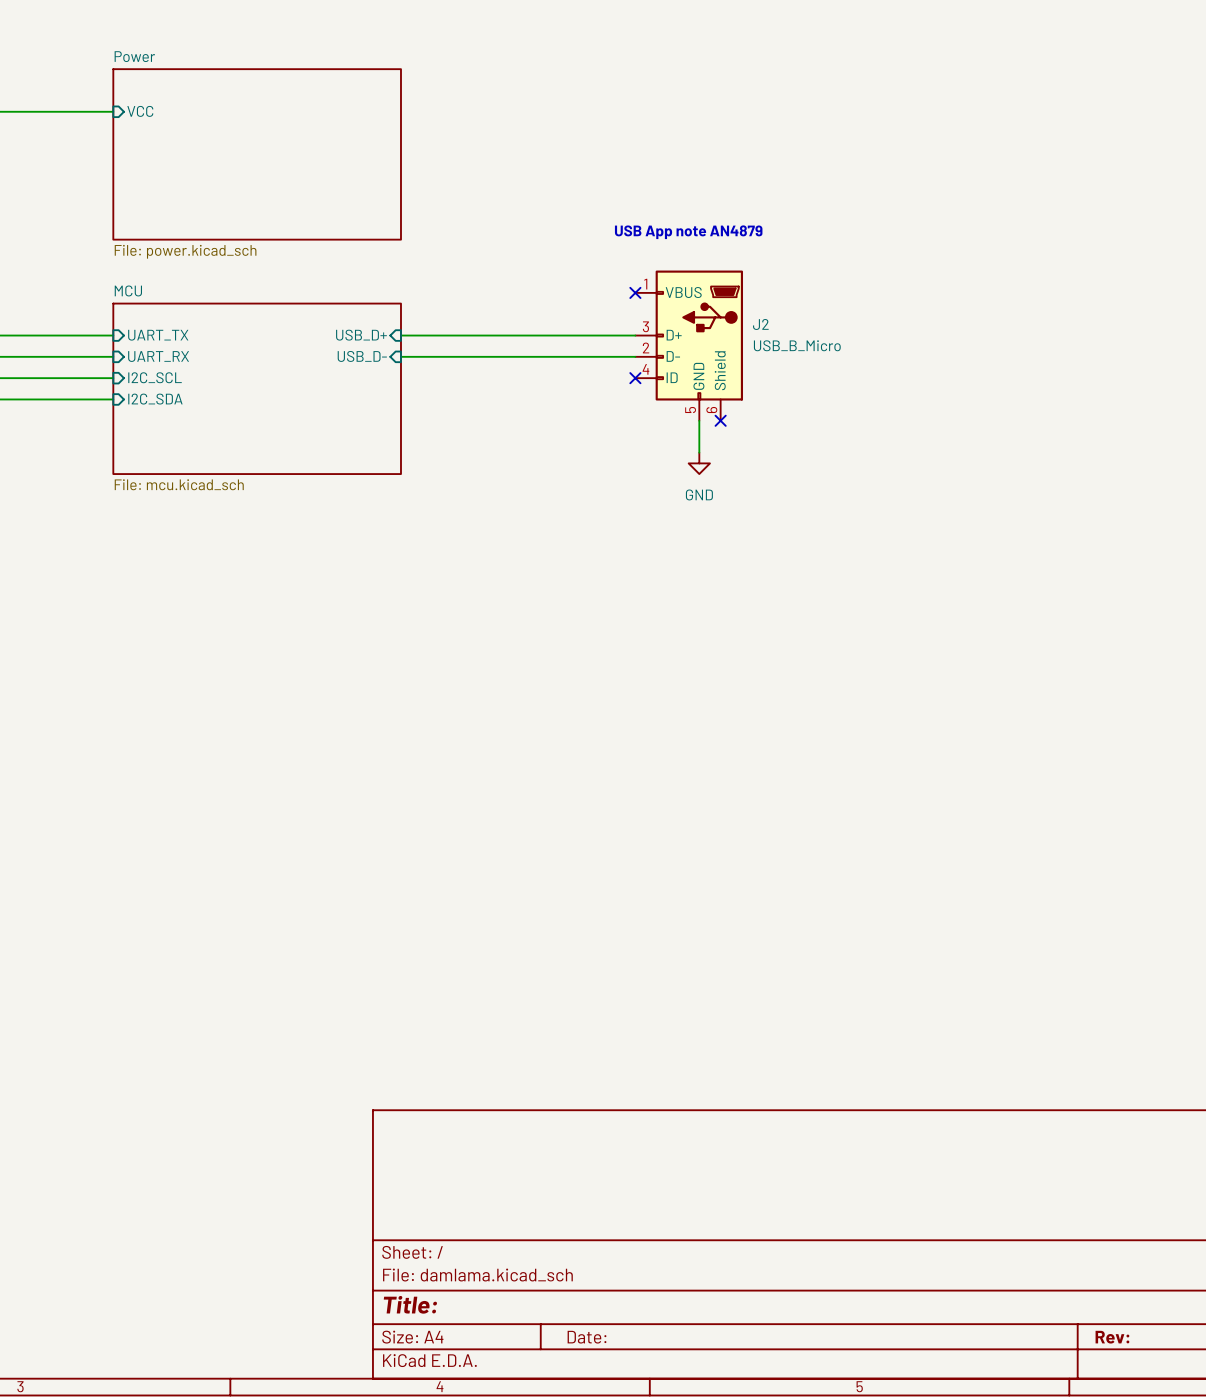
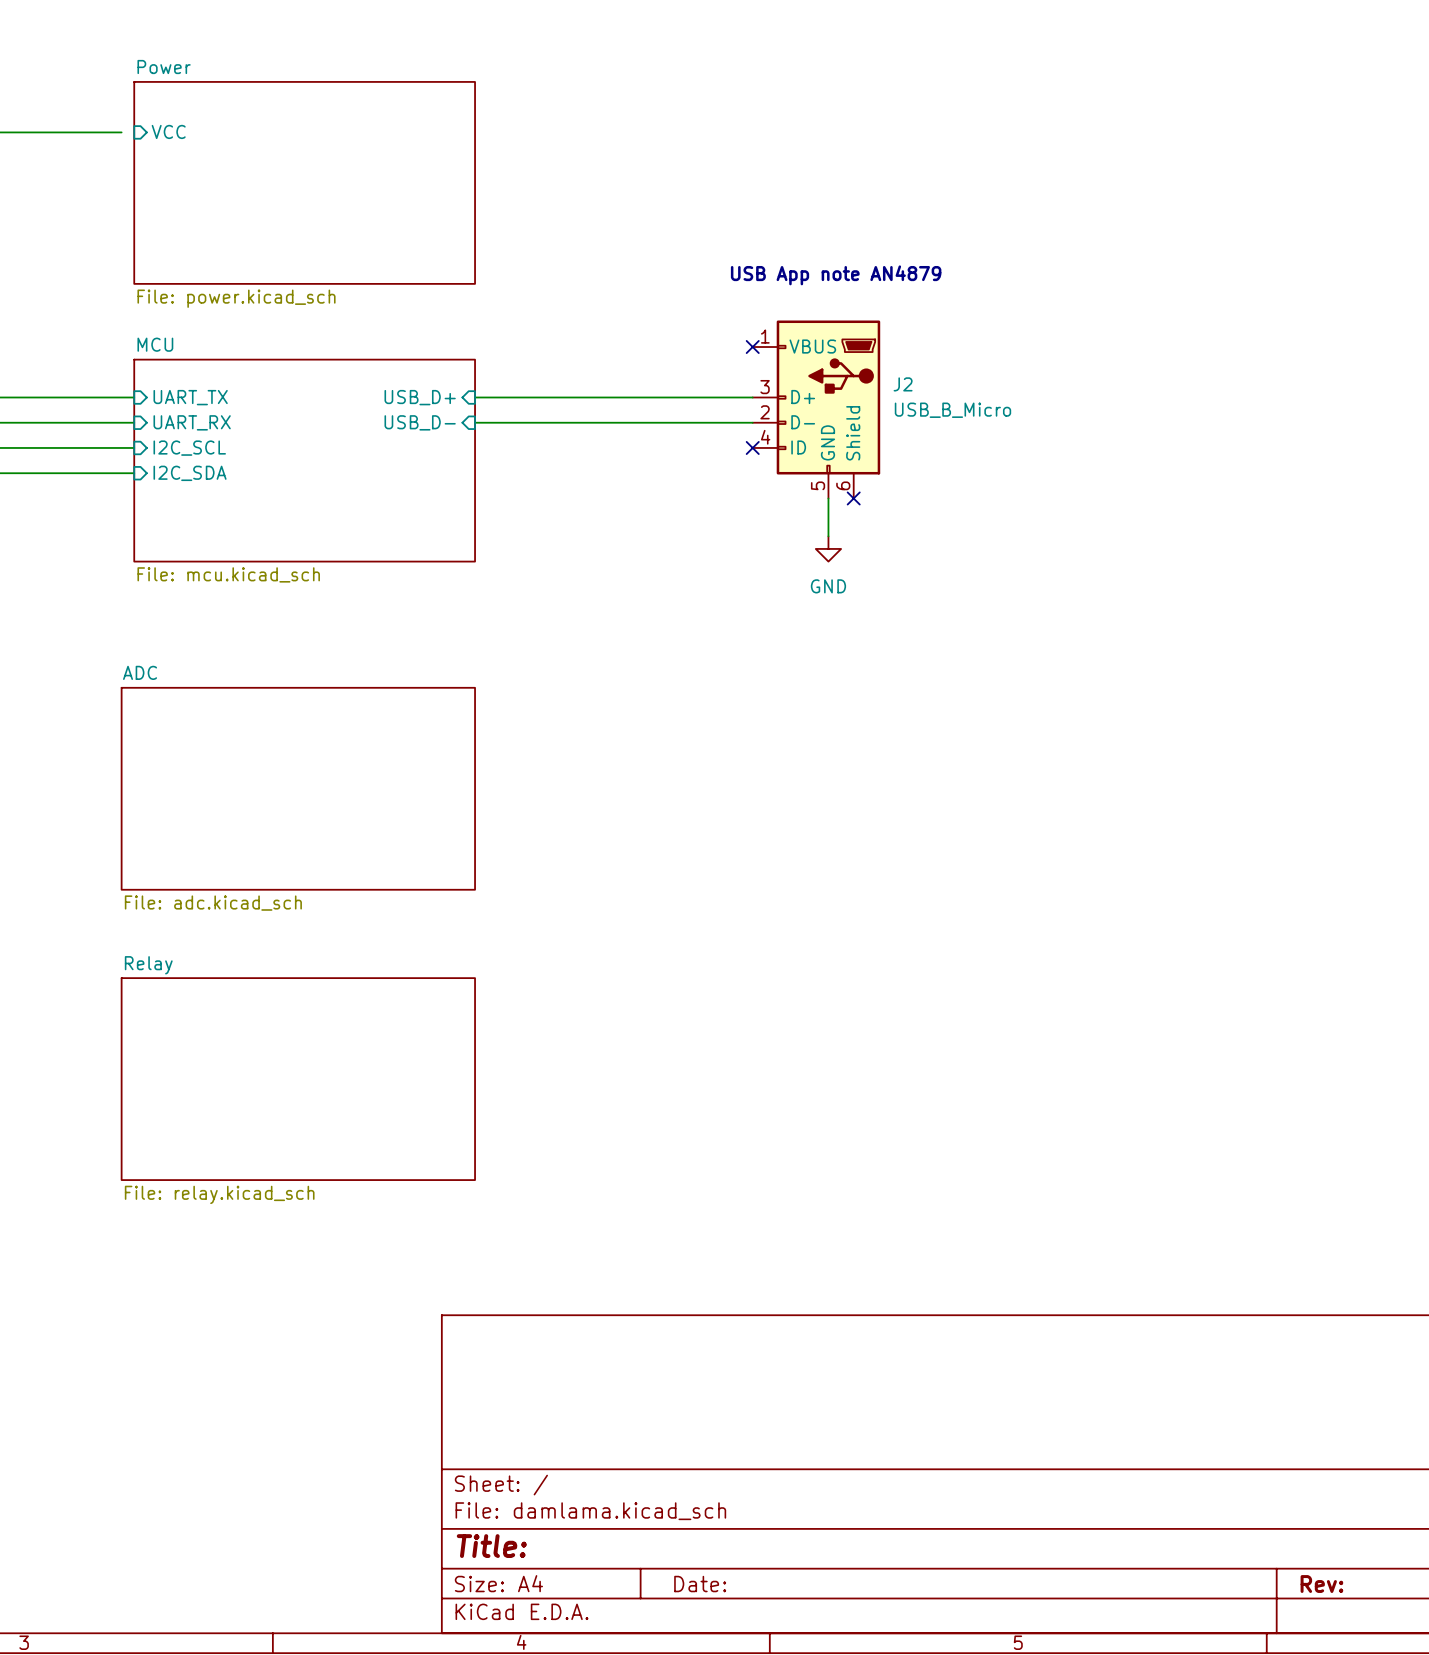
wire: (102, 111) (113, 111) -> none
sheet ADC: none -> File: adc.kicad_sch (298, 788)
sheet Relay: none -> File: relay.kicad_sch (298, 1079)

